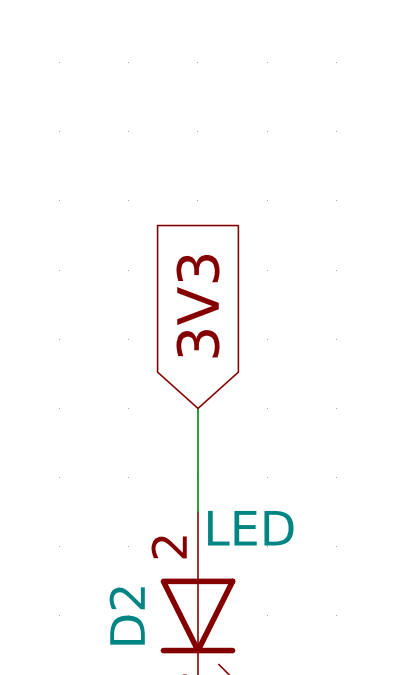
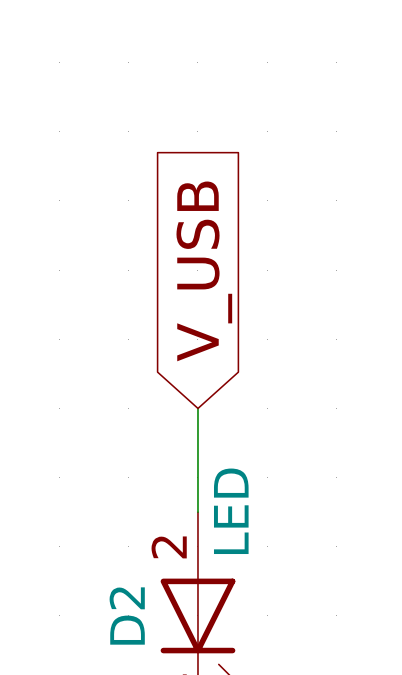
global label: 3V3 (198, 306) -> V_USB (204, 271)
D2 value rotation: 0° (250, 528) -> 90° counterclockwise (231, 511)

